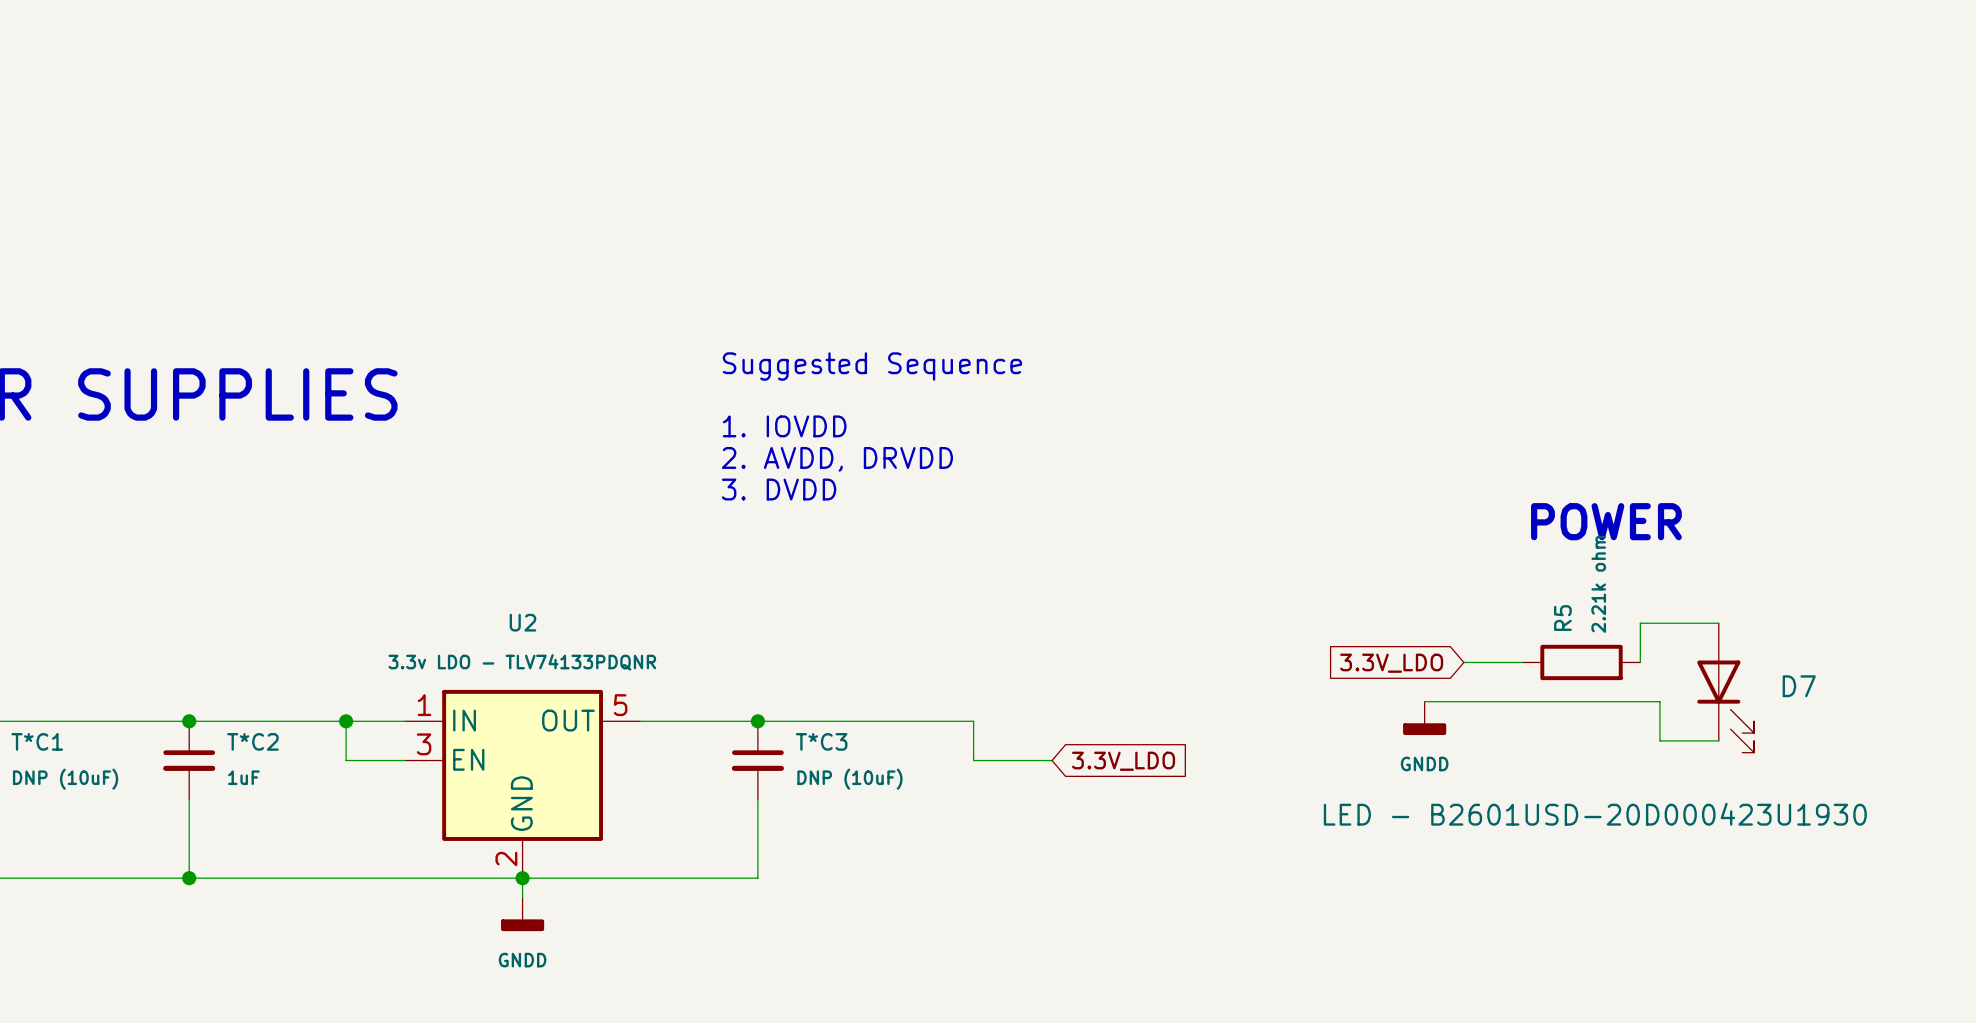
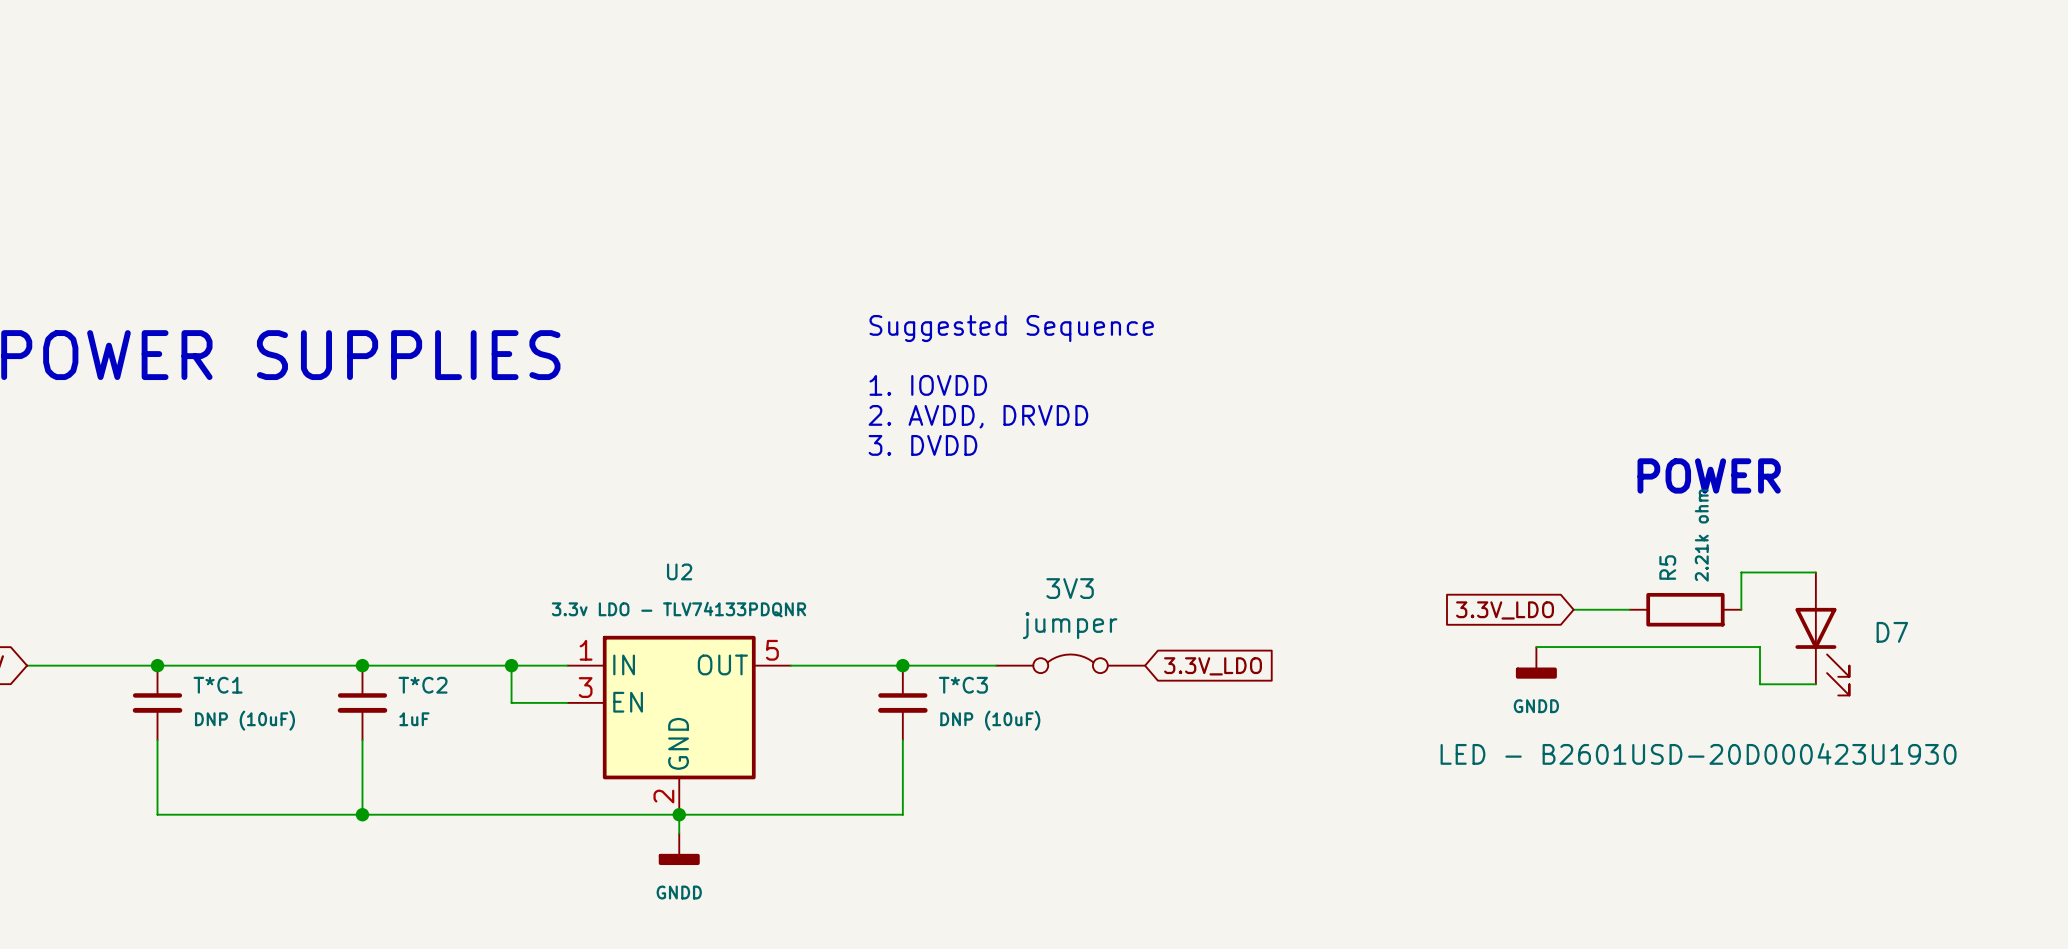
3V3: none -> jumper (1070, 663)
wire: (855, 721) (973, 721) (973, 760) (1052, 760) -> none
global label position: 3.3V_LDO (1123, 761) -> 3.3V_LDO (1213, 666)

